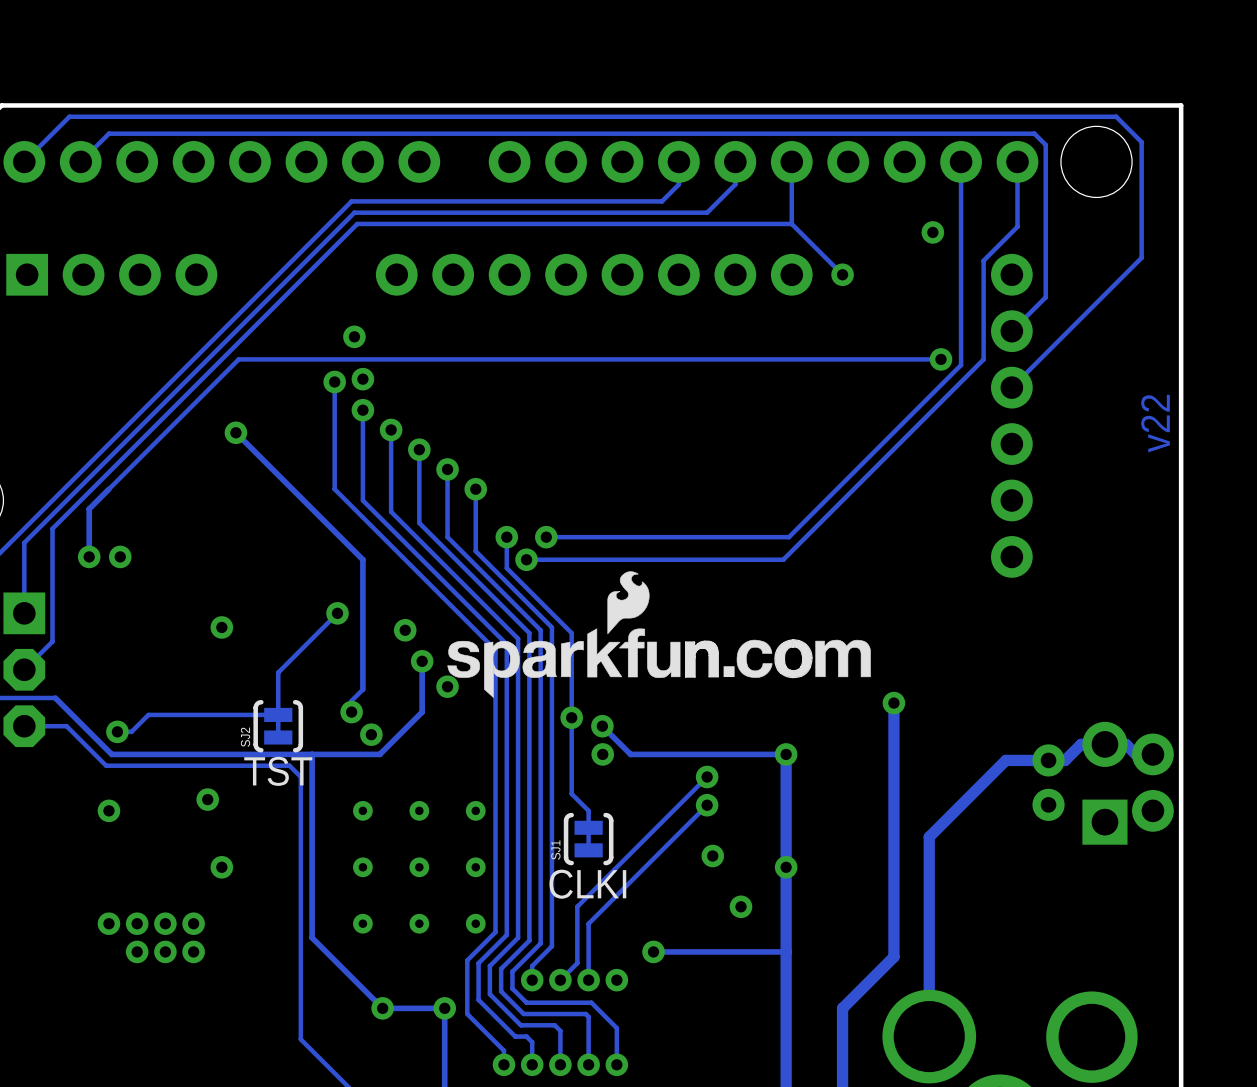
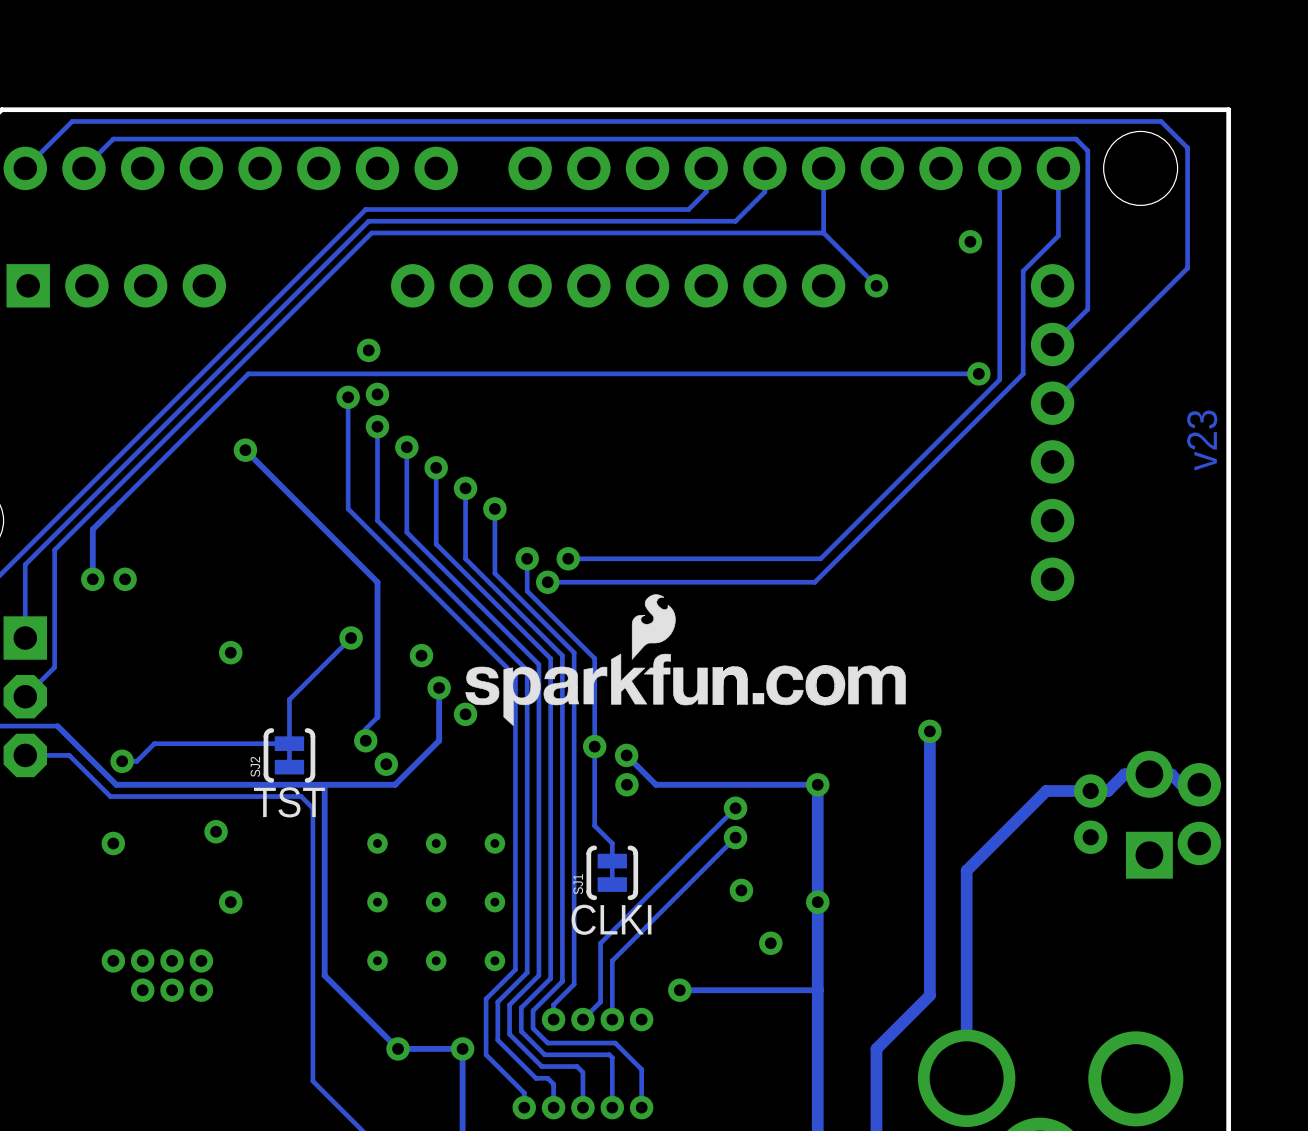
text: v22 (1155, 423) -> v23 (1202, 440)

